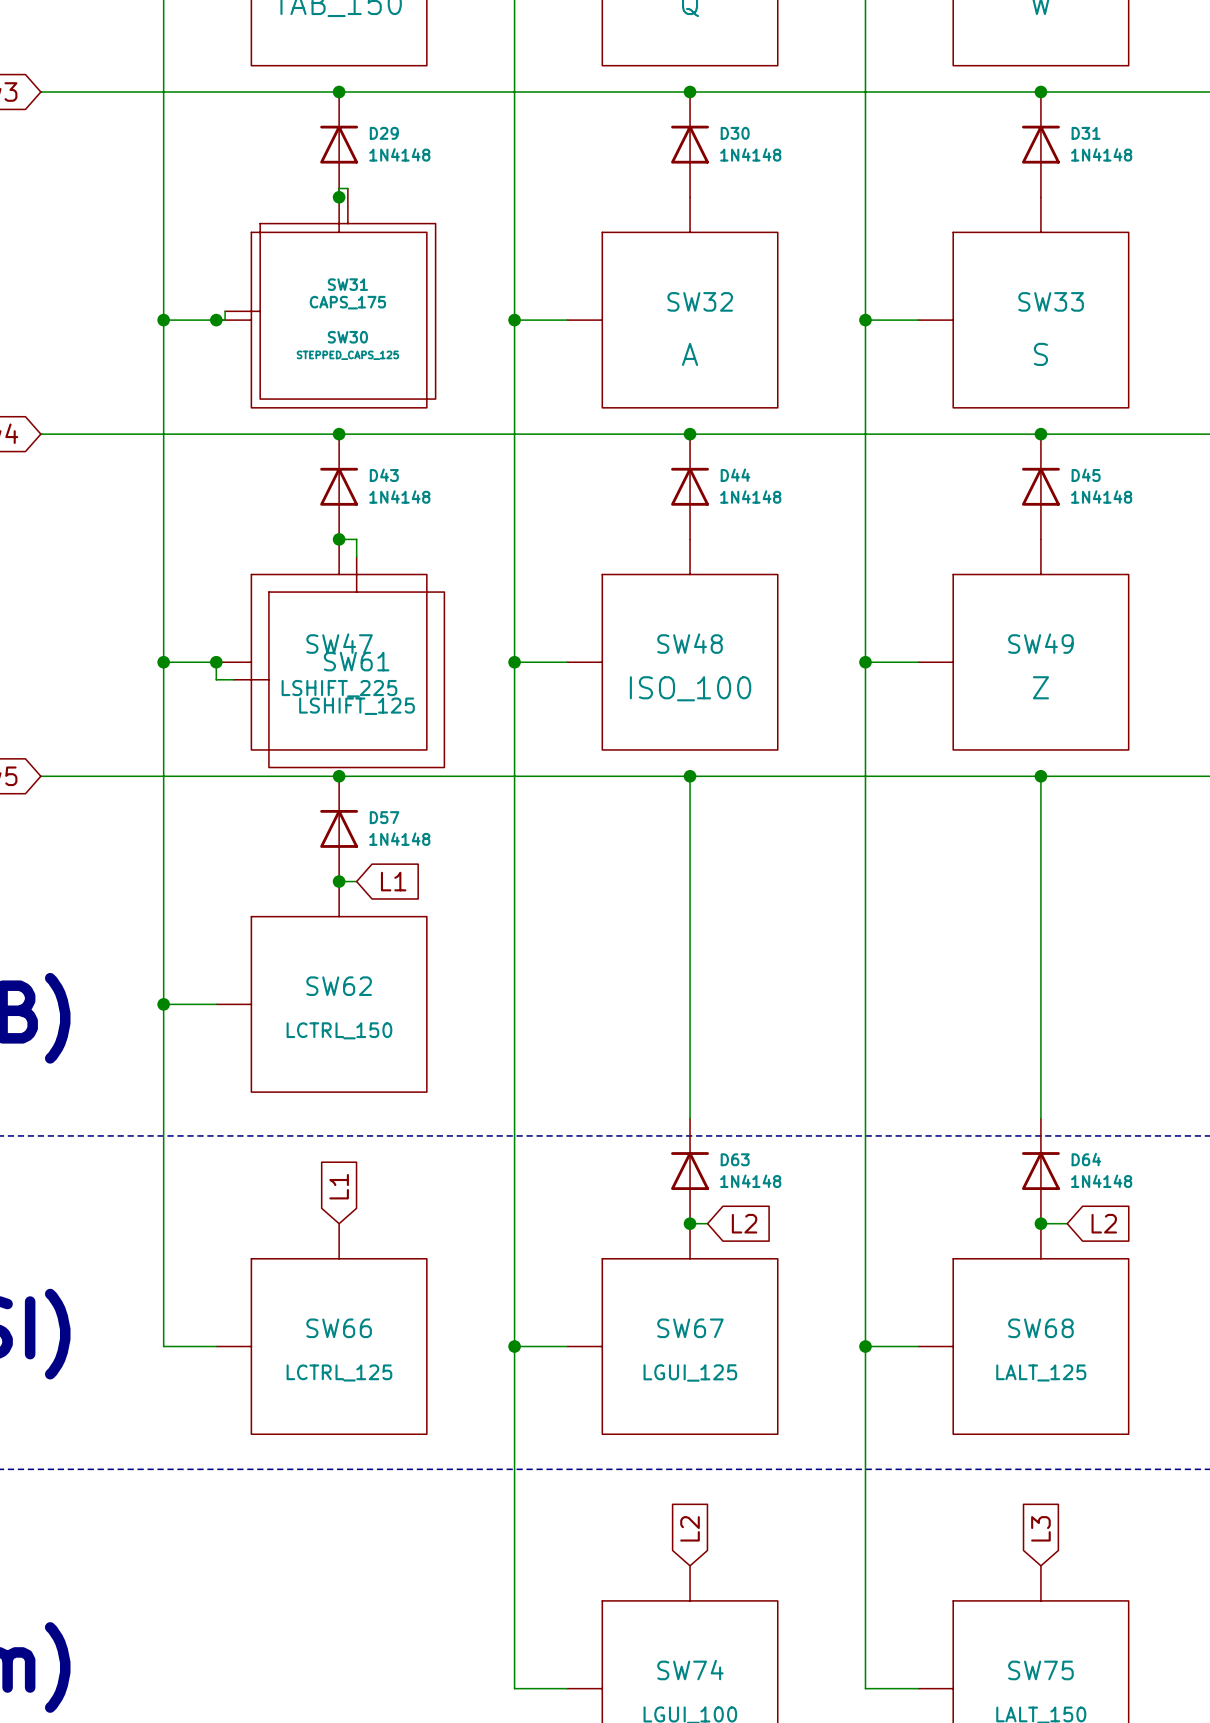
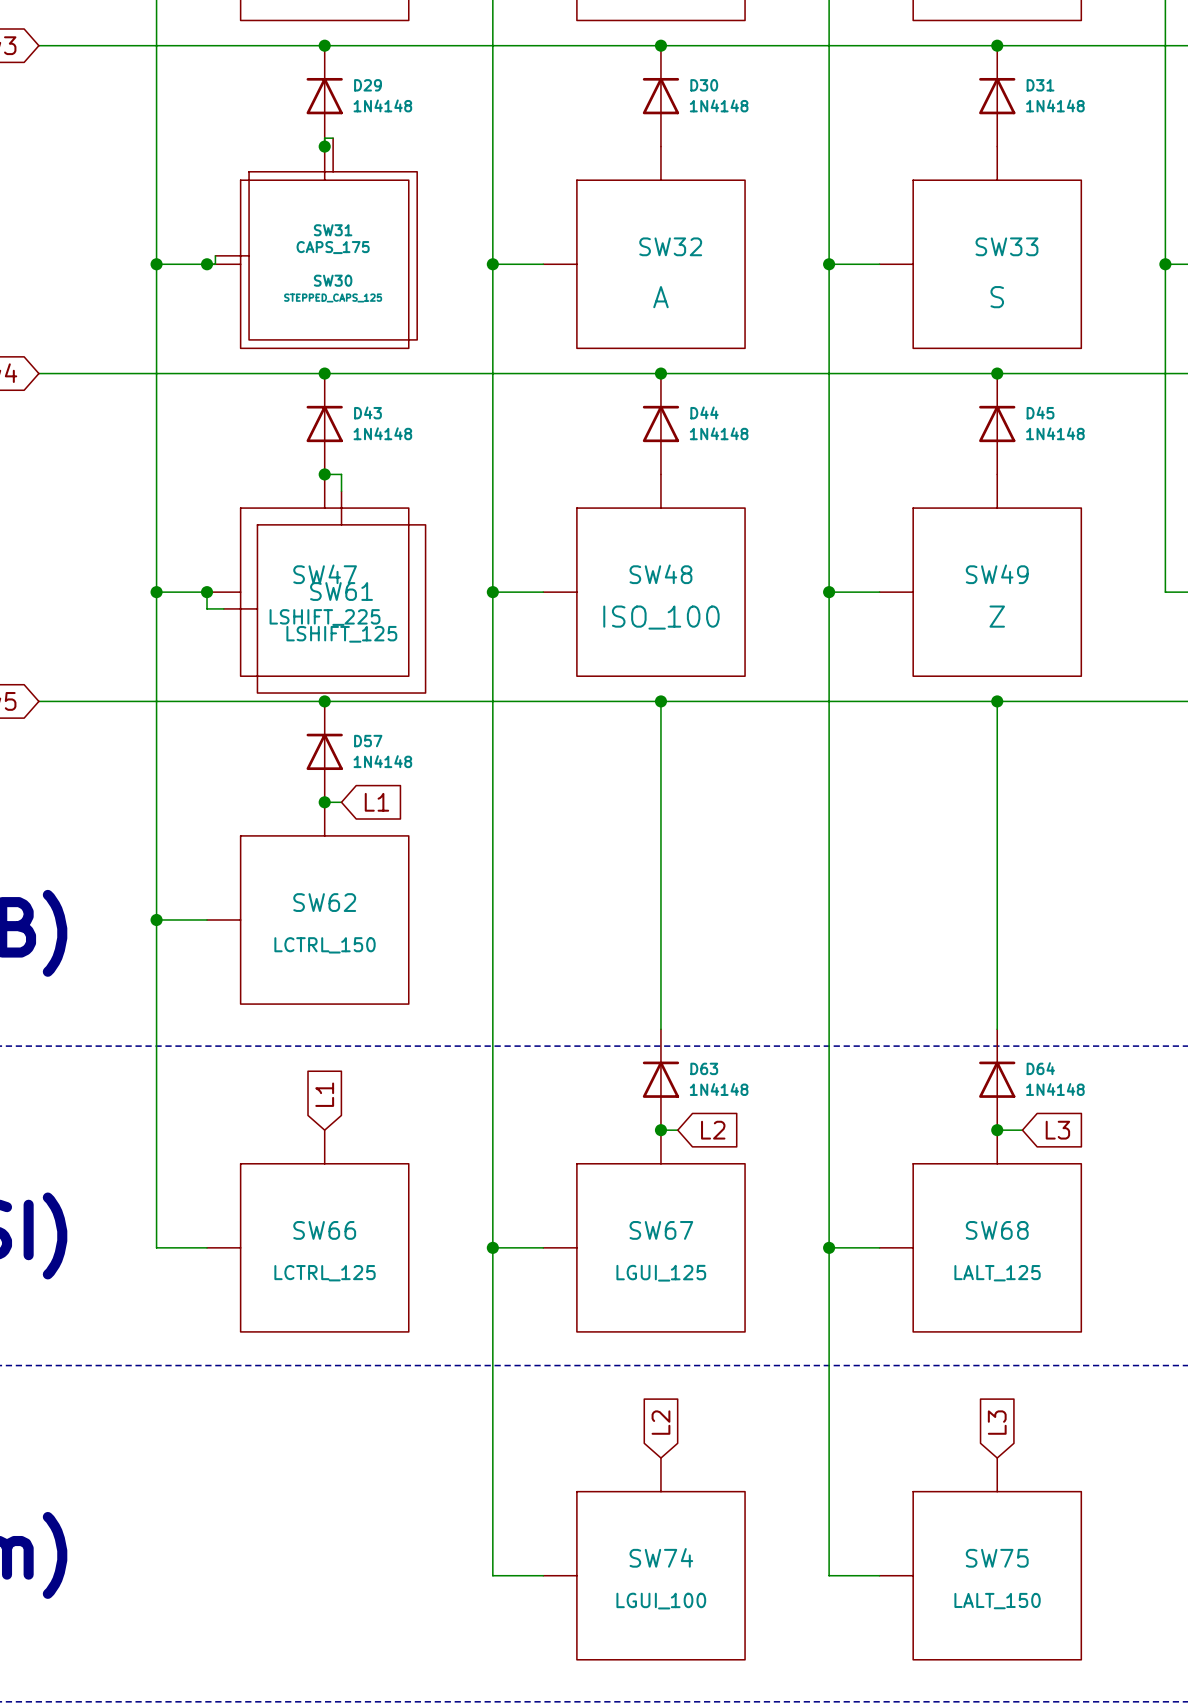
global label: L2 (1104, 1223) -> L3 (1057, 1130)

